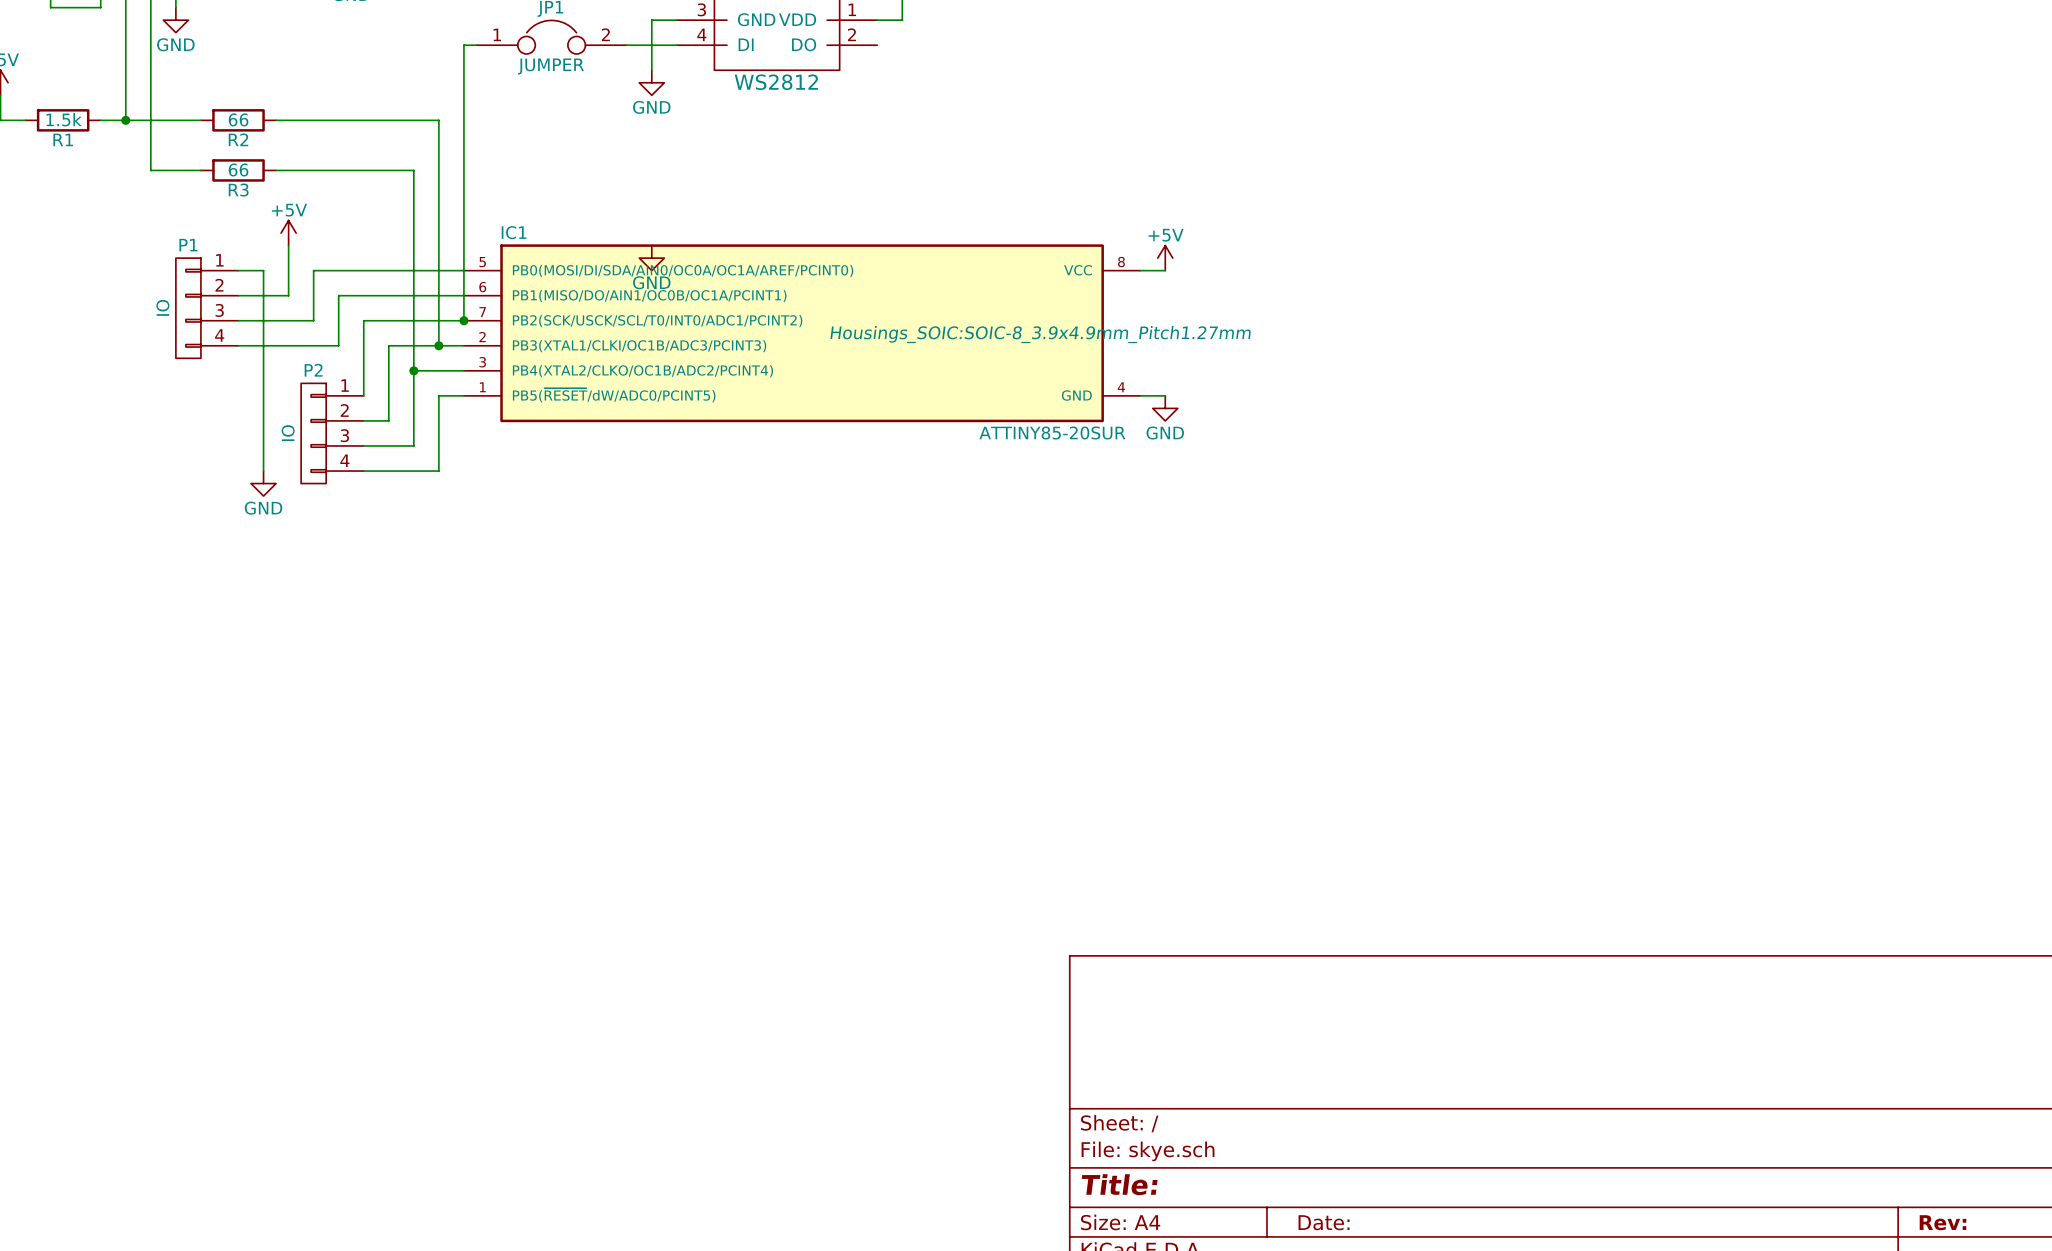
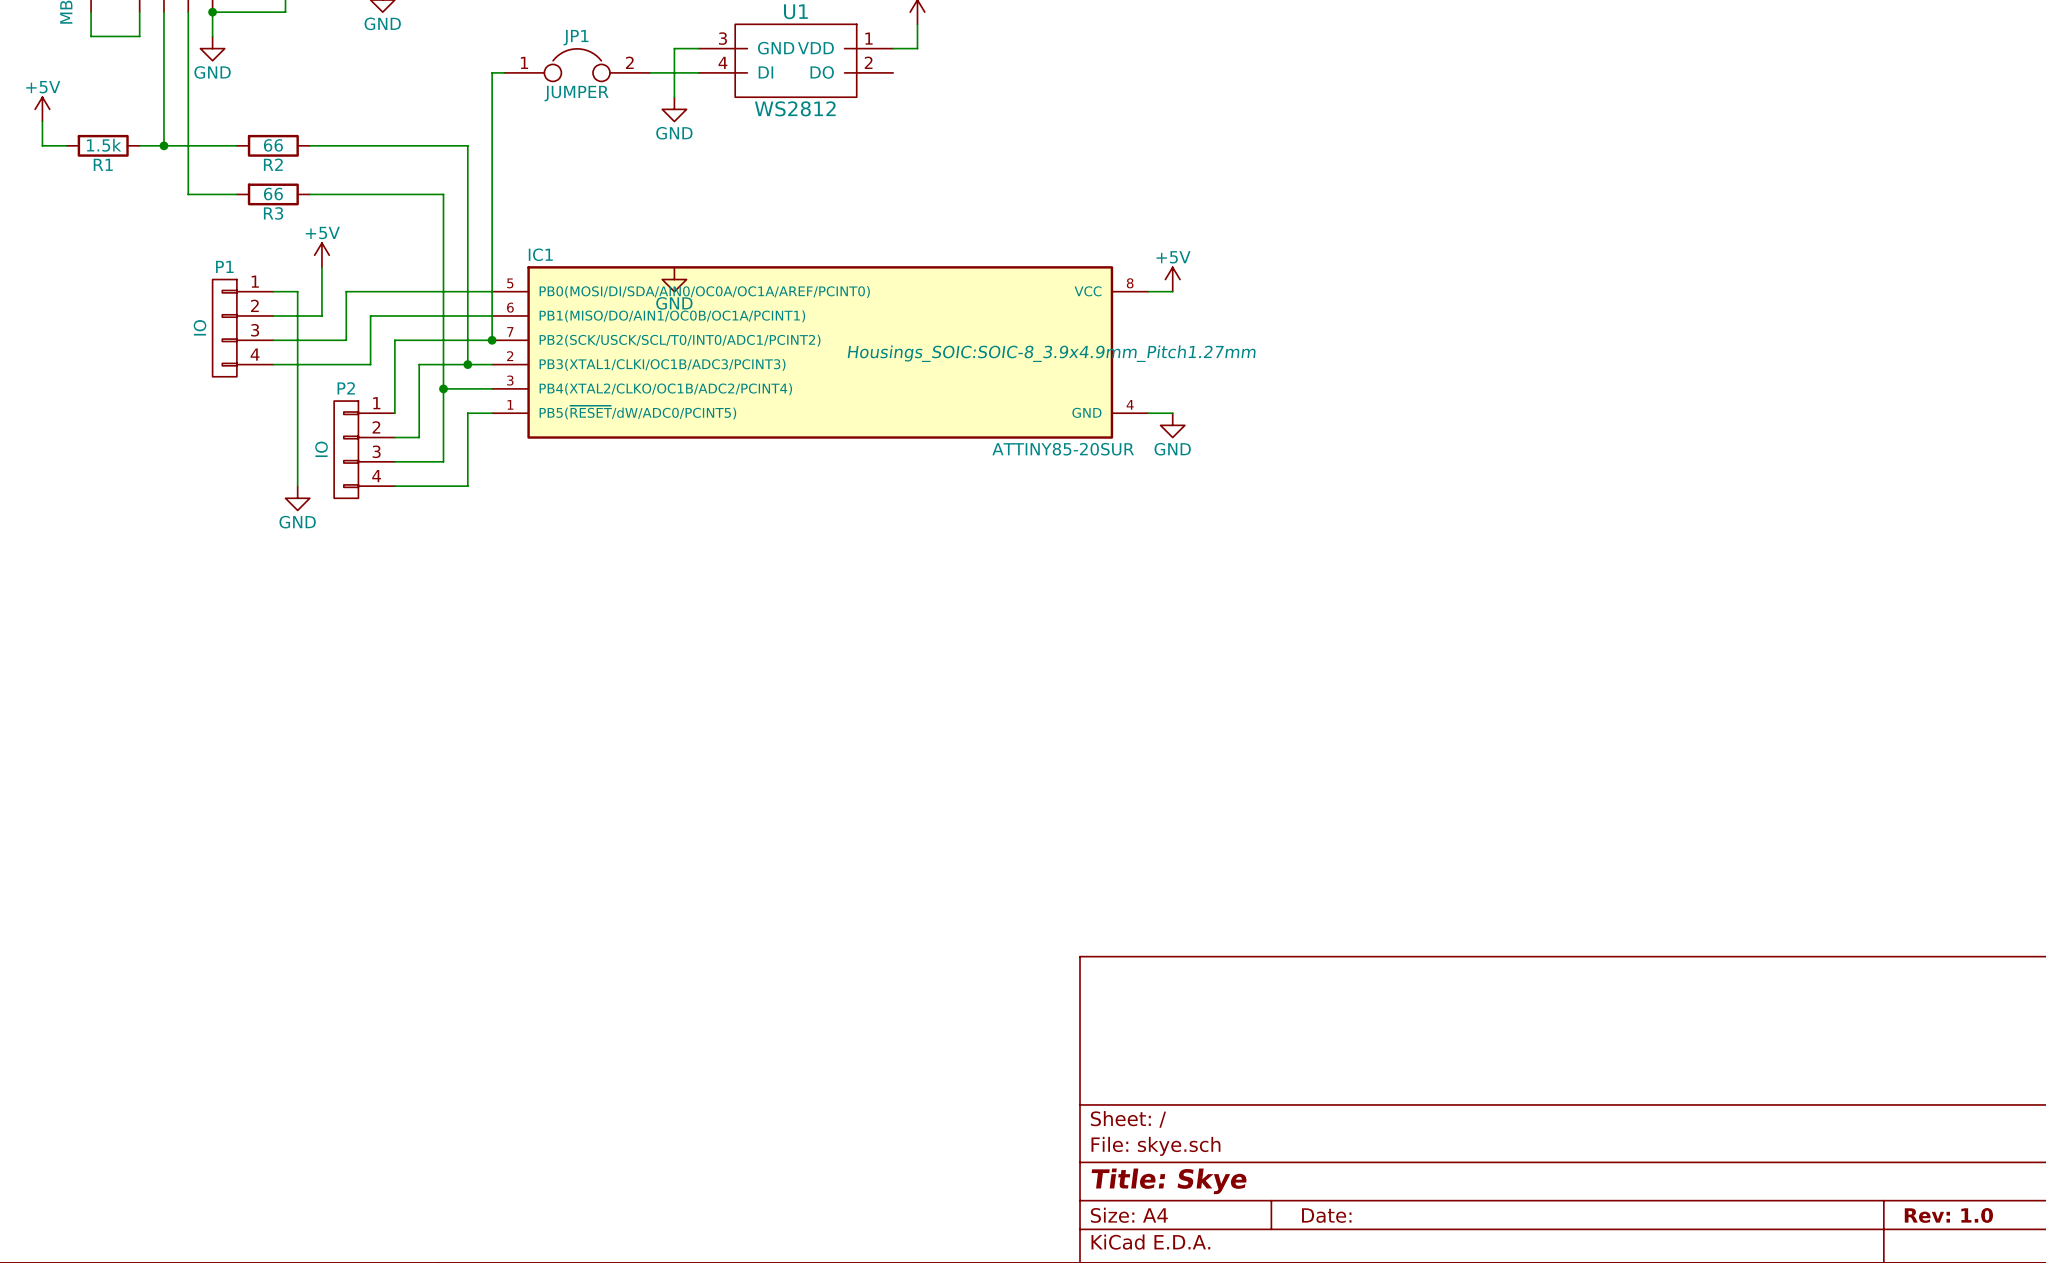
title block: Title: (1119, 1184) -> Title: Skye (1169, 1181)
title block: Rev: (1942, 1222) -> Rev: 1.0 (1948, 1215)

